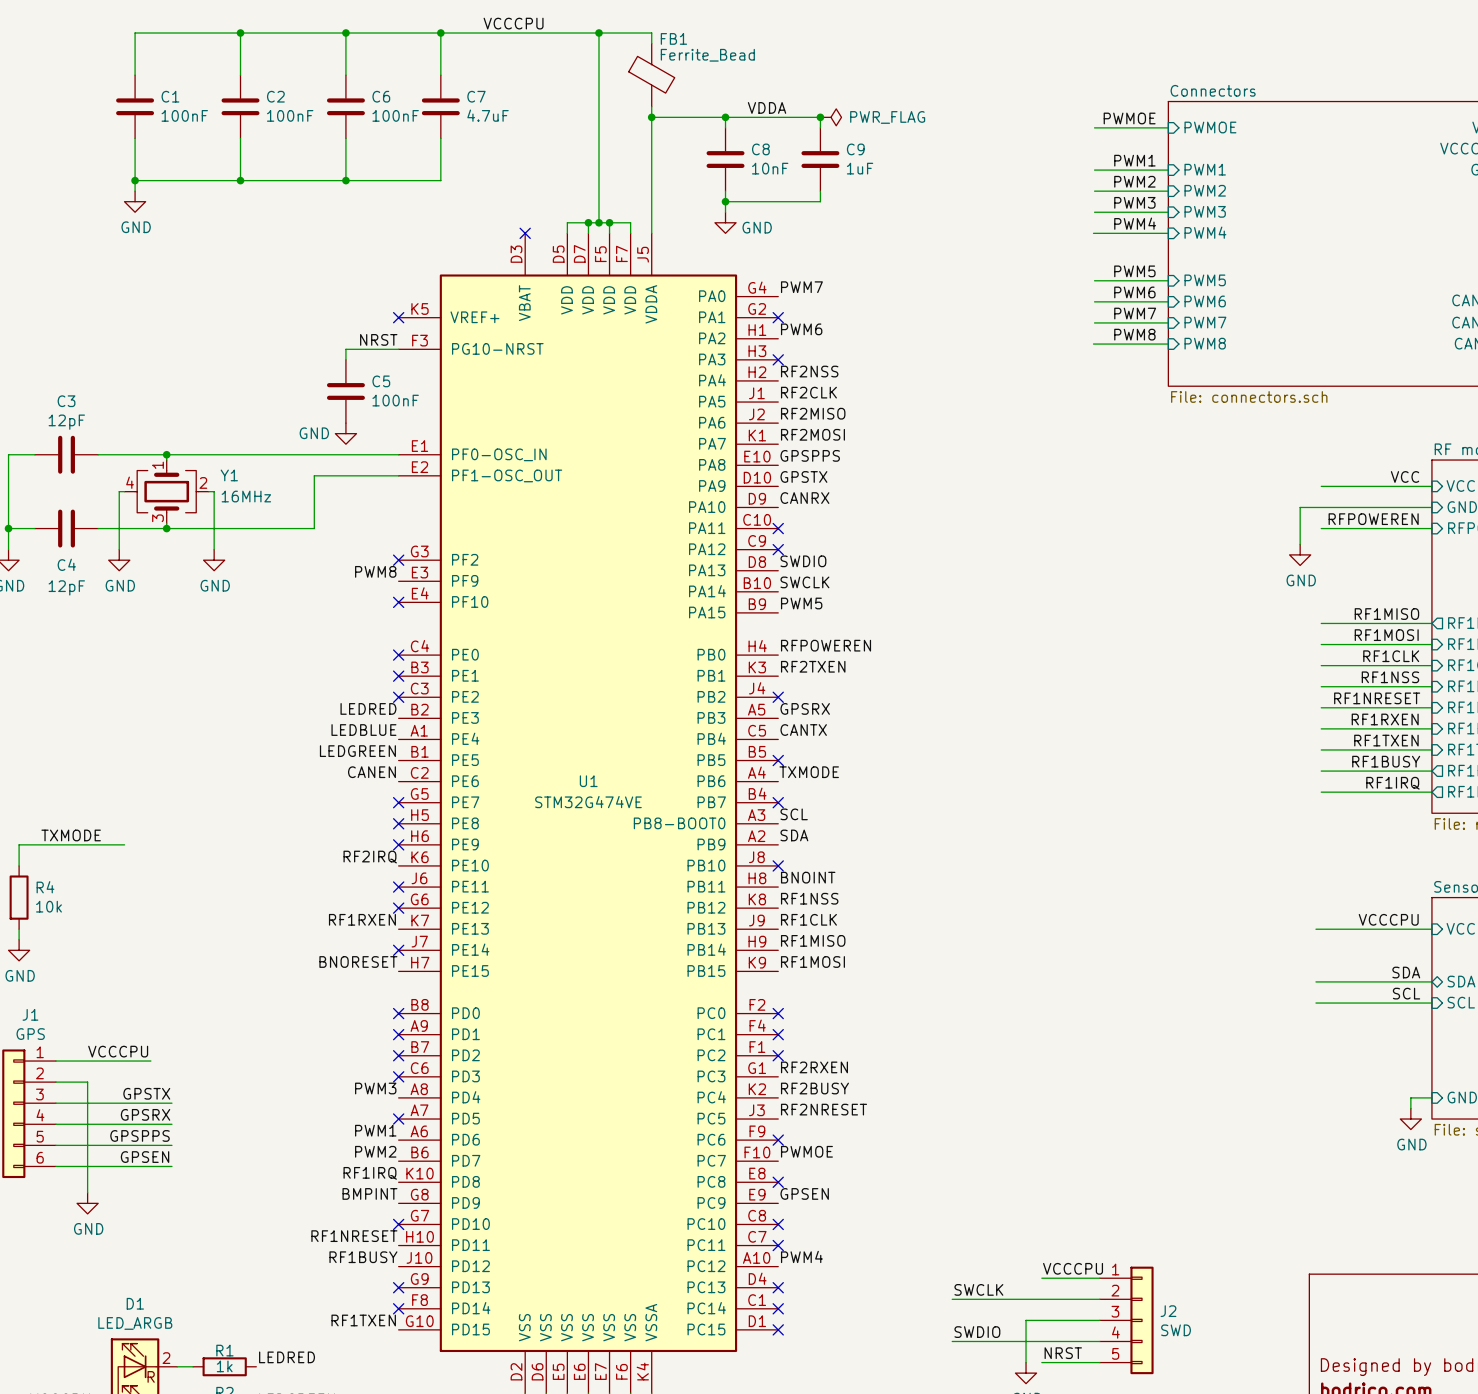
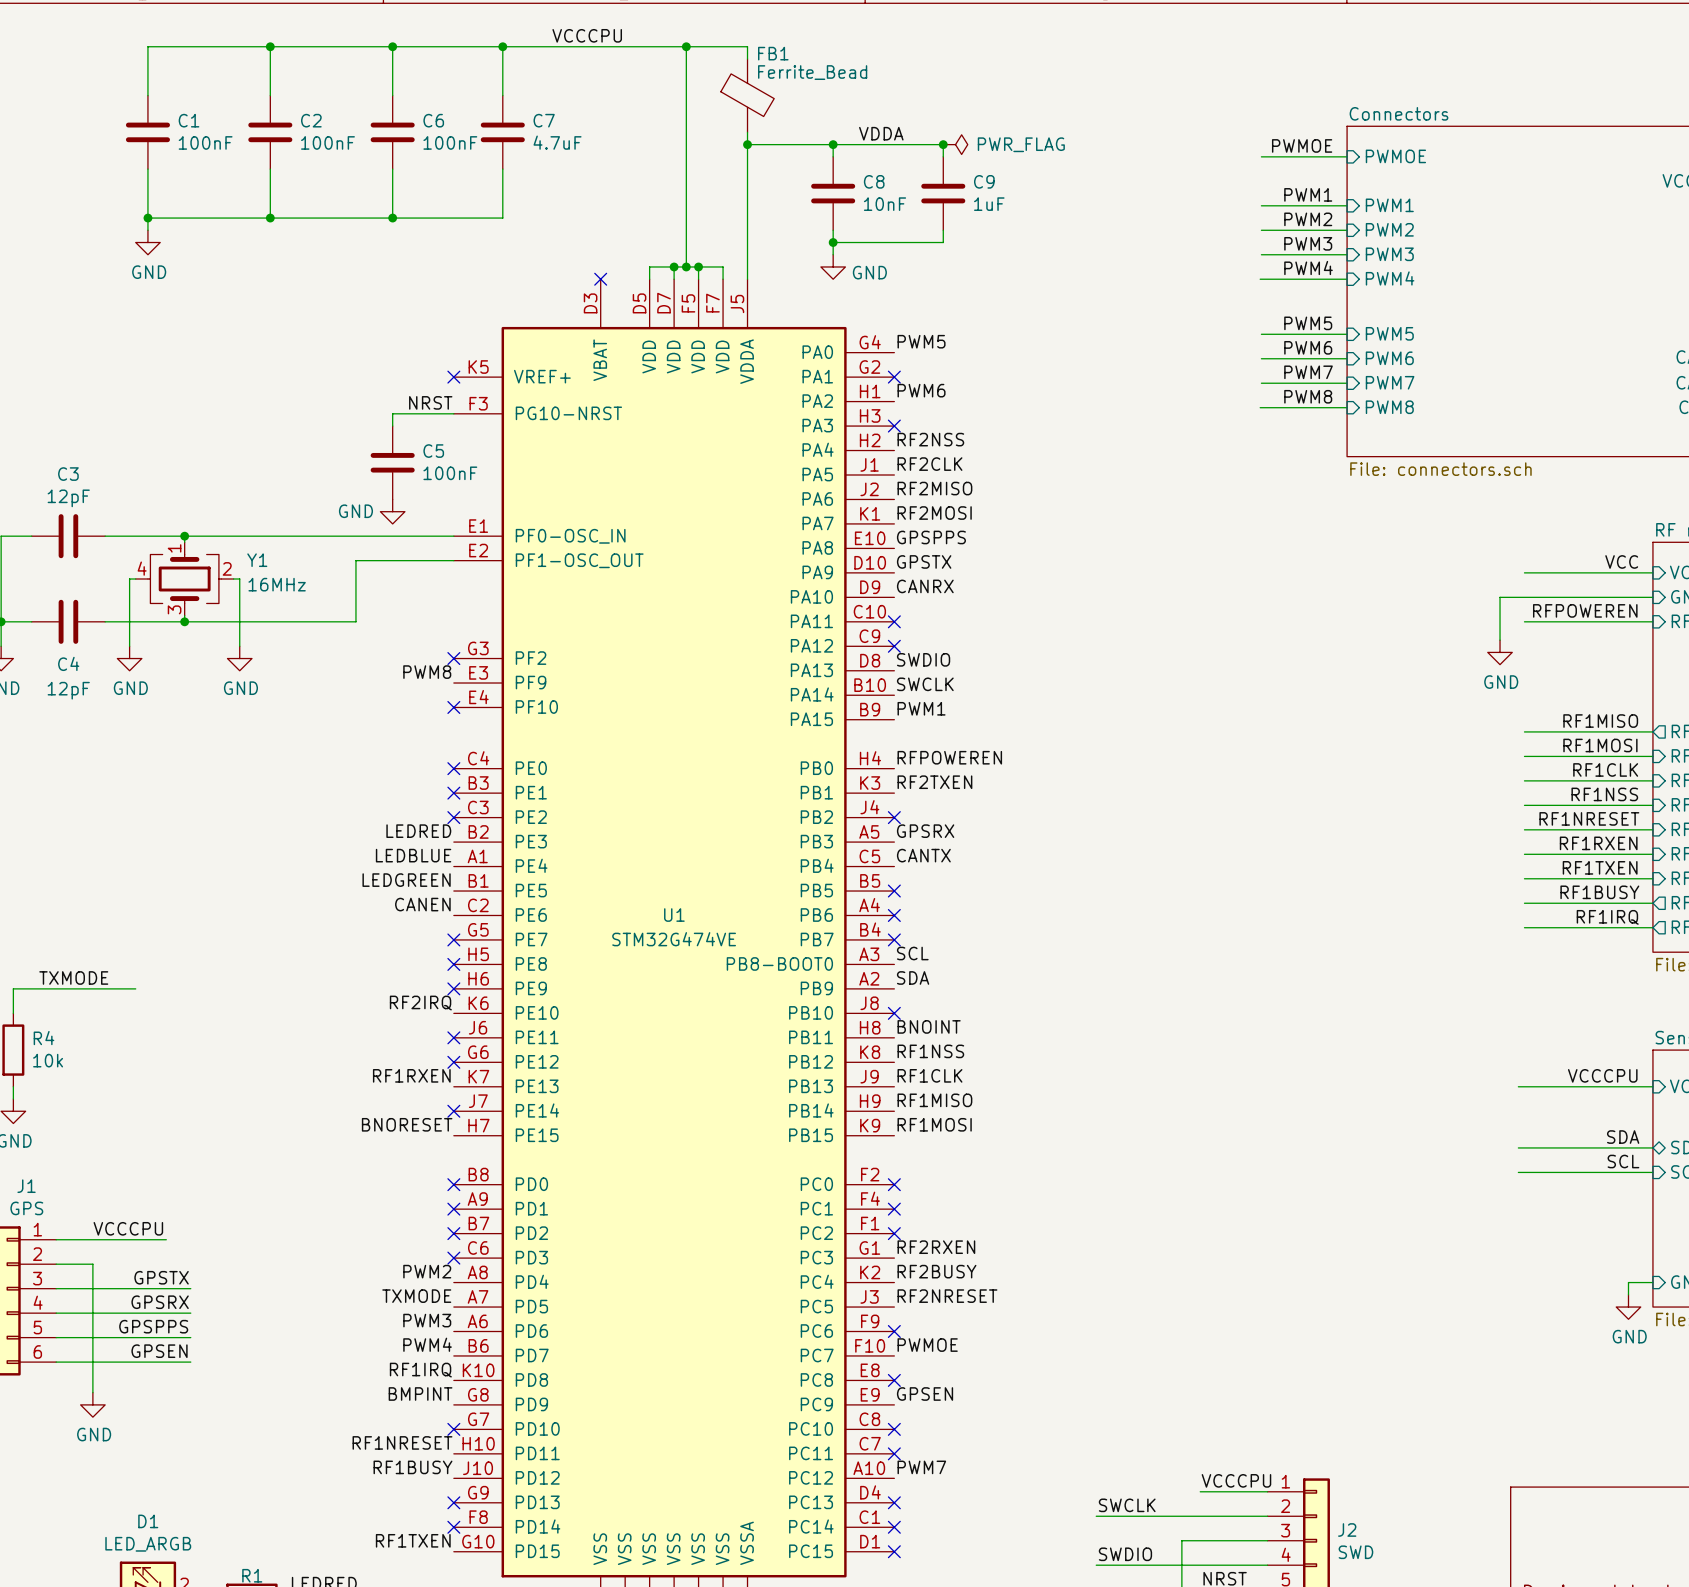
label: PWM7 (801, 287) -> PWM5 (921, 341)
label: PWM5 (801, 603) -> PWM1 (921, 708)
label: TXMODE (809, 772) -> none
no-connect mark: none -> (894, 915)
label: PWM3 (375, 1088) -> PWM2 (427, 1271)
label: none -> TXMODE (416, 1296)
no-connect mark: (398, 1119) -> none
label: PWM1 (375, 1130) -> PWM3 (427, 1320)
label: PWM2 (375, 1151) -> PWM4 (427, 1344)
label: PWM4 (801, 1256) -> PWM7 (921, 1467)

